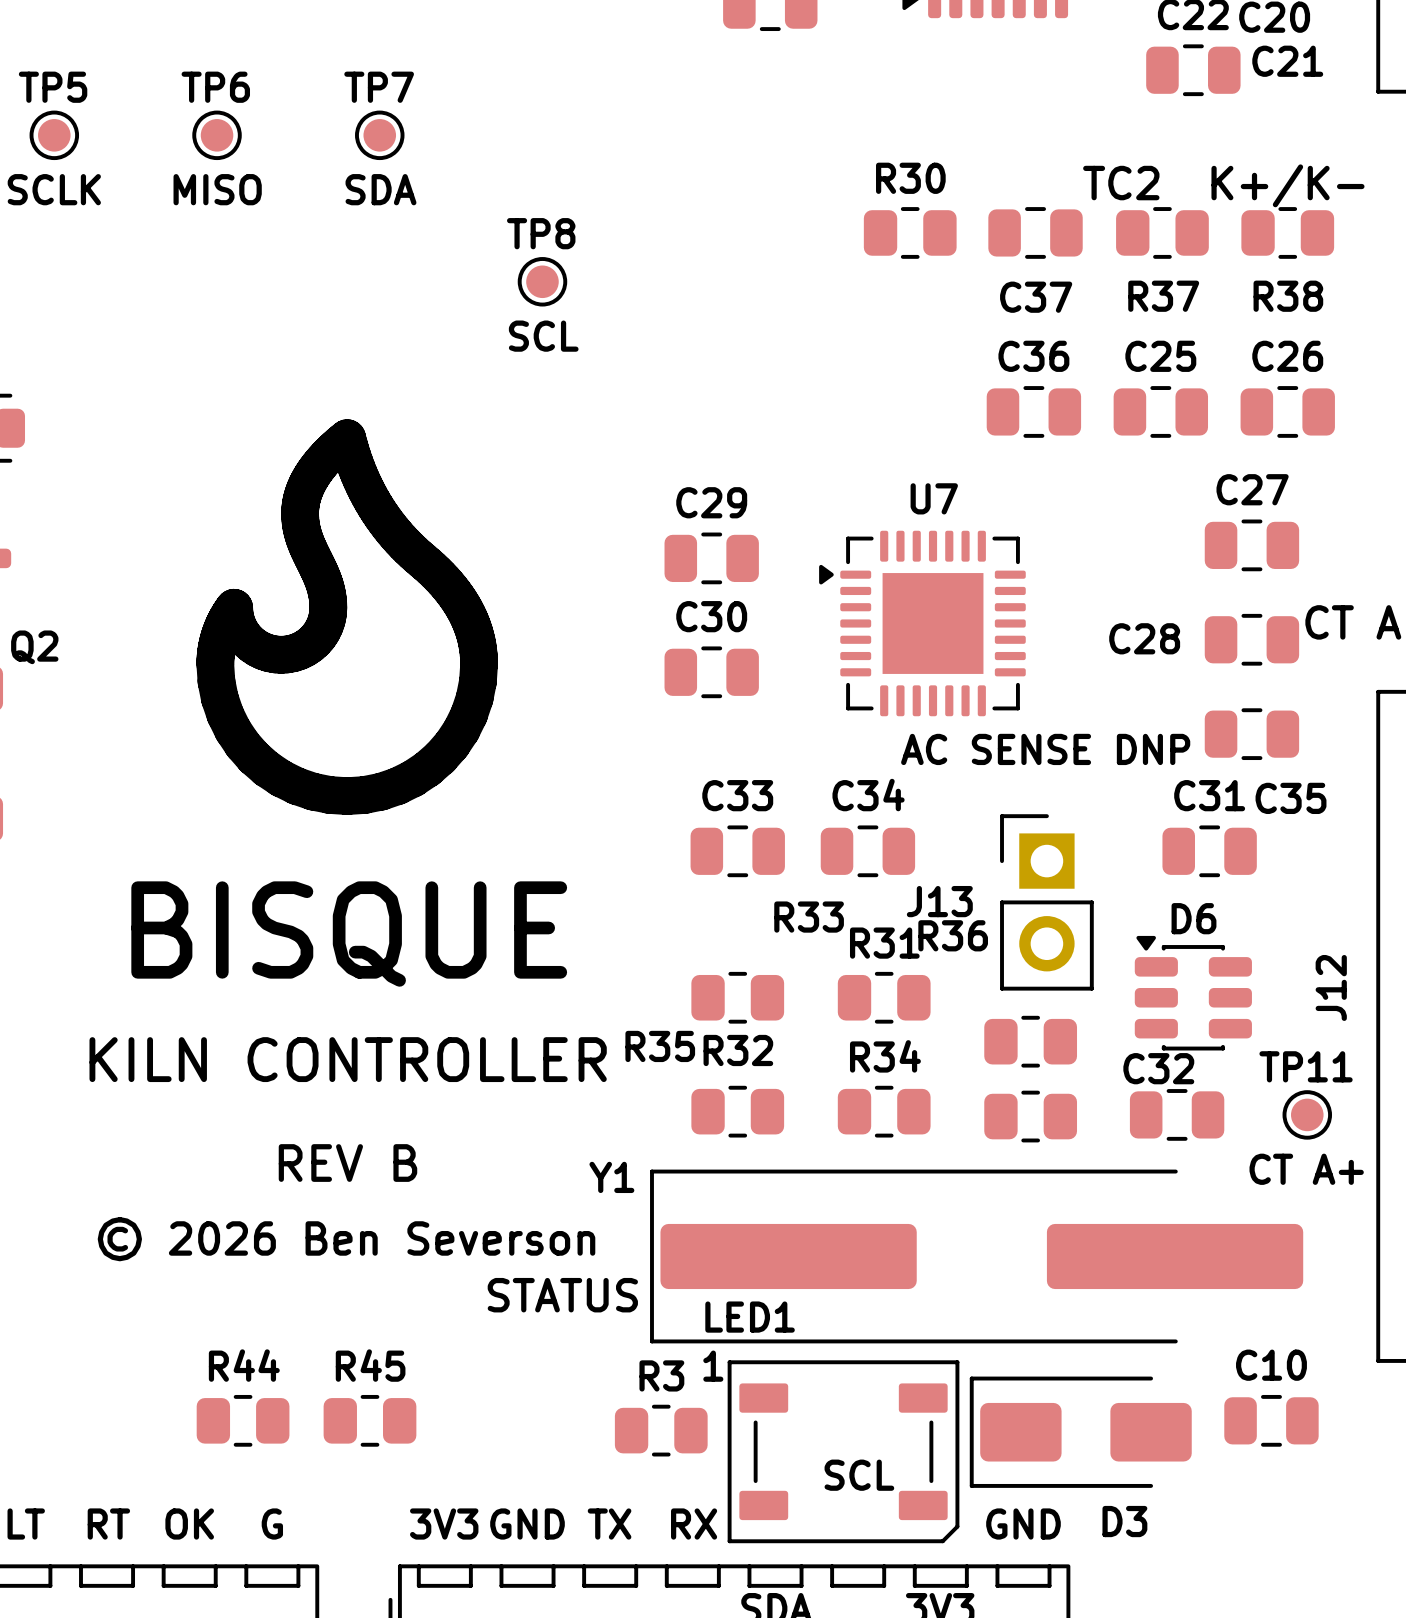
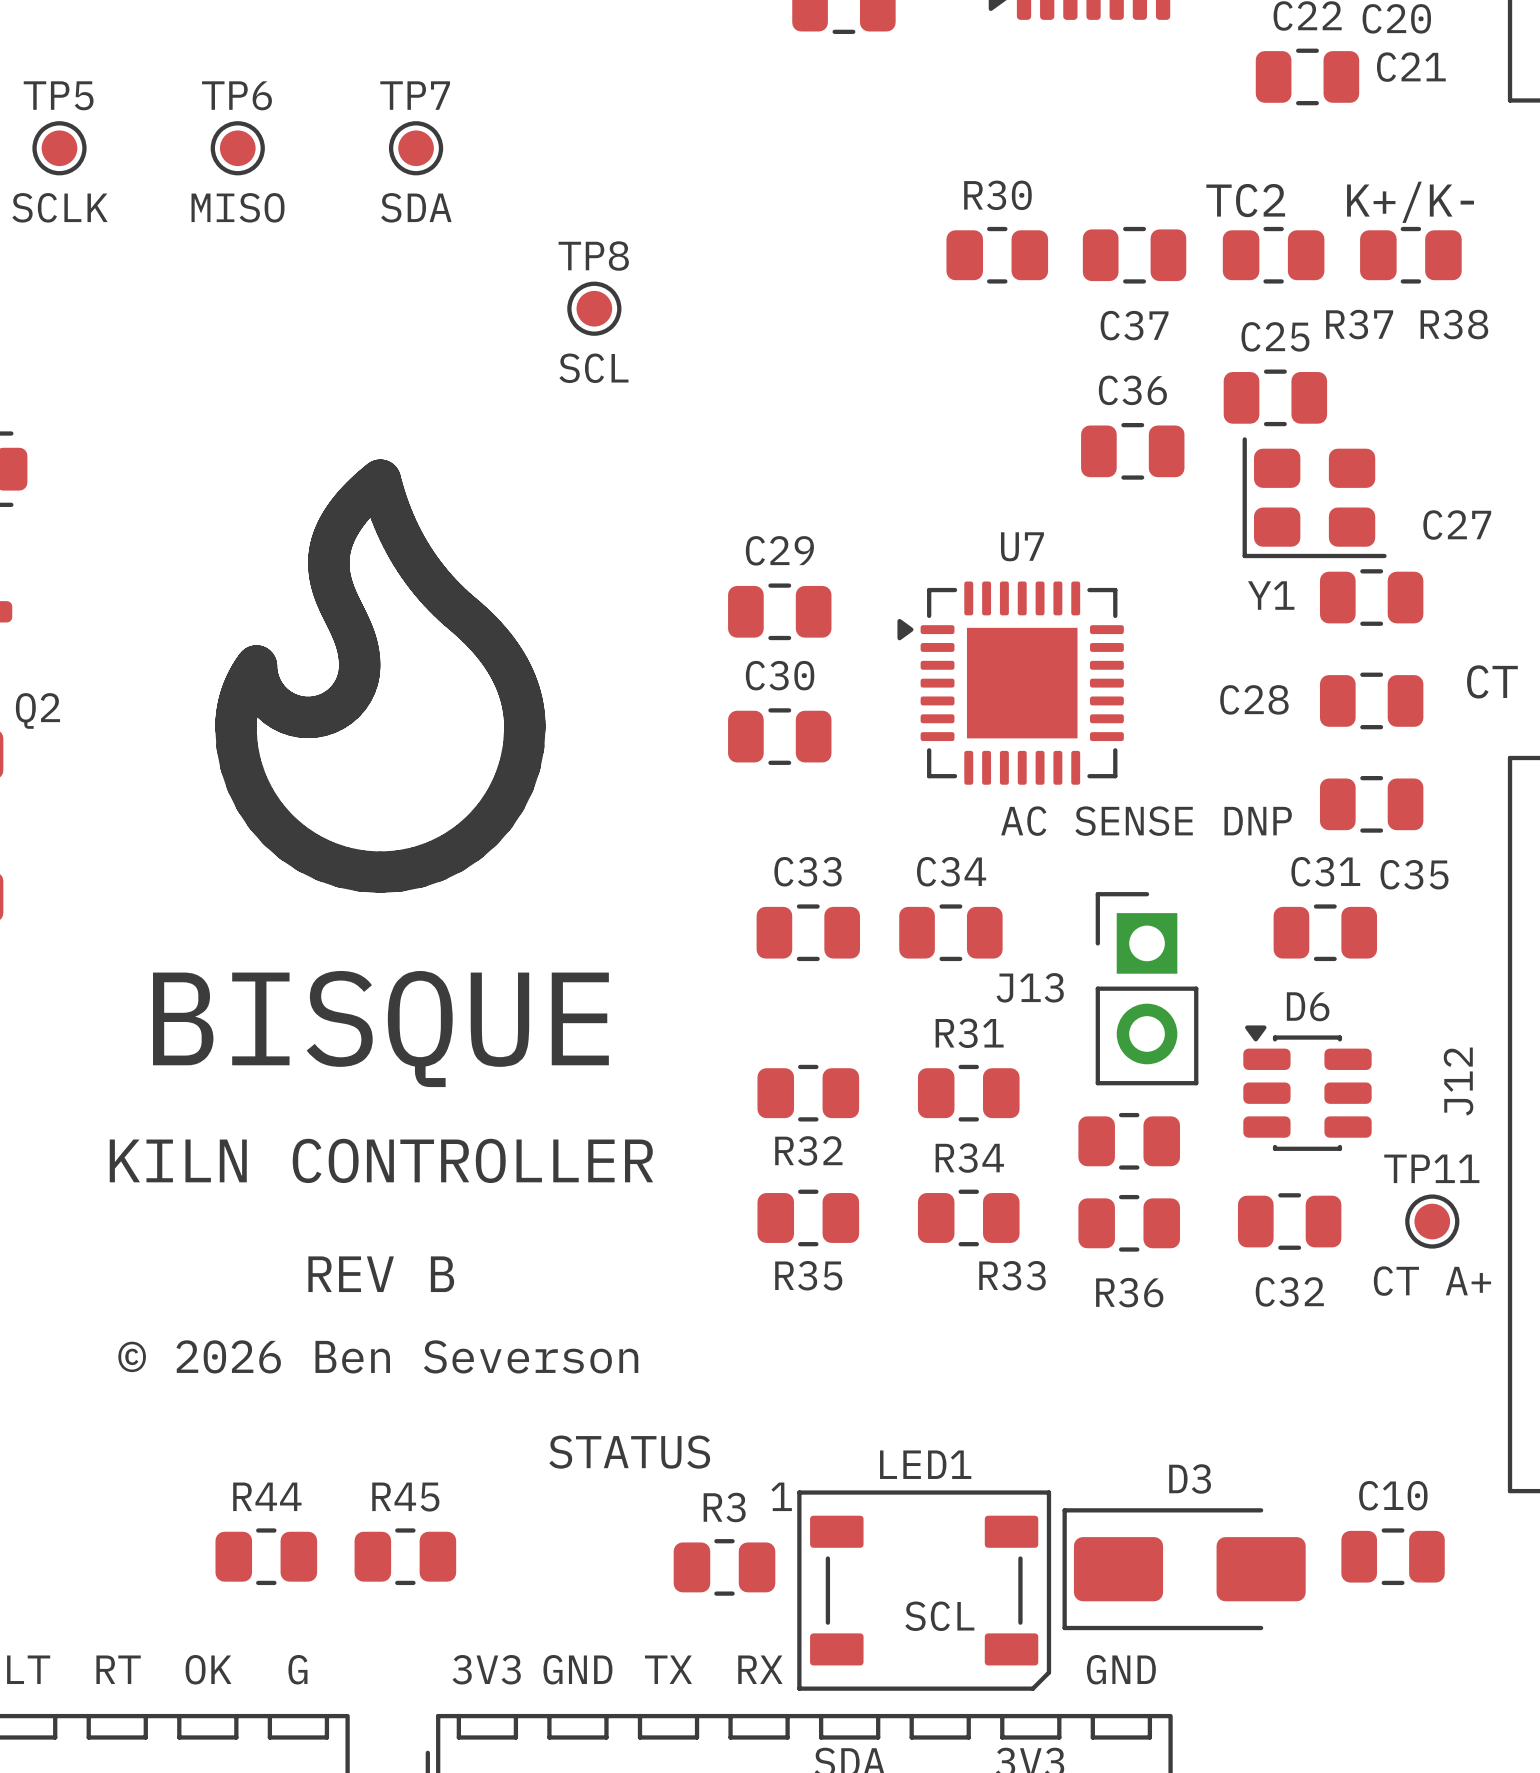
R37 name position: R37 (1163, 296) -> R37 (1359, 324)
R38 name position: R38 (1288, 296) -> R38 (1454, 324)
C25 position: (1160, 411) -> (1275, 397)
C26: (1287, 411) -> none
C27 name position: C27 (1252, 489) -> C27 (1457, 525)
R33 name position: R33 (809, 917) -> R33 (1012, 1275)
R36 name position: R36 (953, 935) -> R36 (1129, 1292)
R35 name position: R35 (660, 1046) -> R35 (808, 1275)
C32 name position: C32 (1158, 1068) -> C32 (1289, 1291)
Y1 footprint: [650, 1169, 1304, 1344] -> [1242, 437, 1387, 559]
Y1 name position: Y1 (611, 1177) -> Y1 (1271, 595)
text position: STATUS (562, 1295) -> STATUS (629, 1452)
LED1 name position: LED1 (750, 1317) -> LED1 (925, 1464)
D3 name position: D3 (1124, 1521) -> D3 (1190, 1478)

